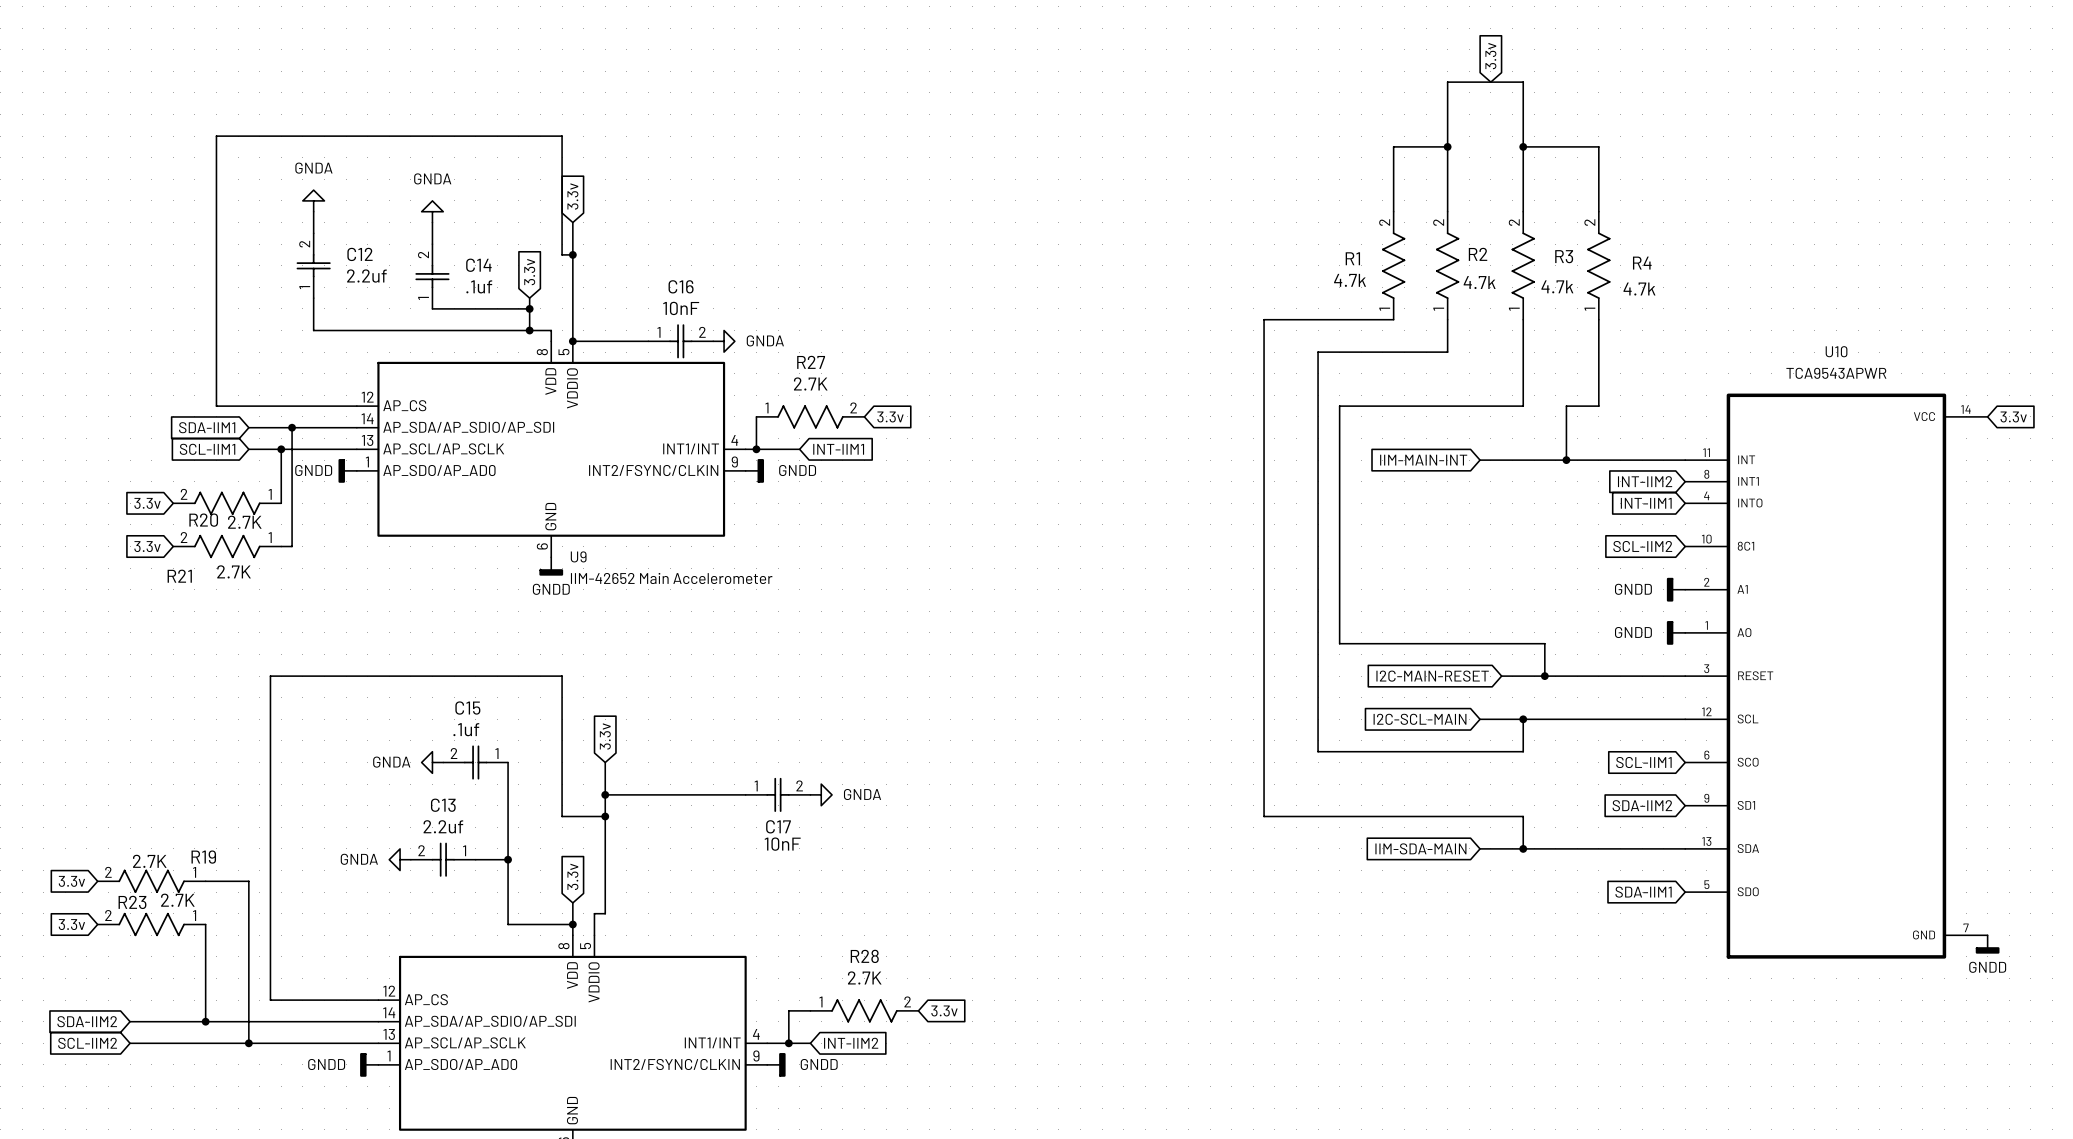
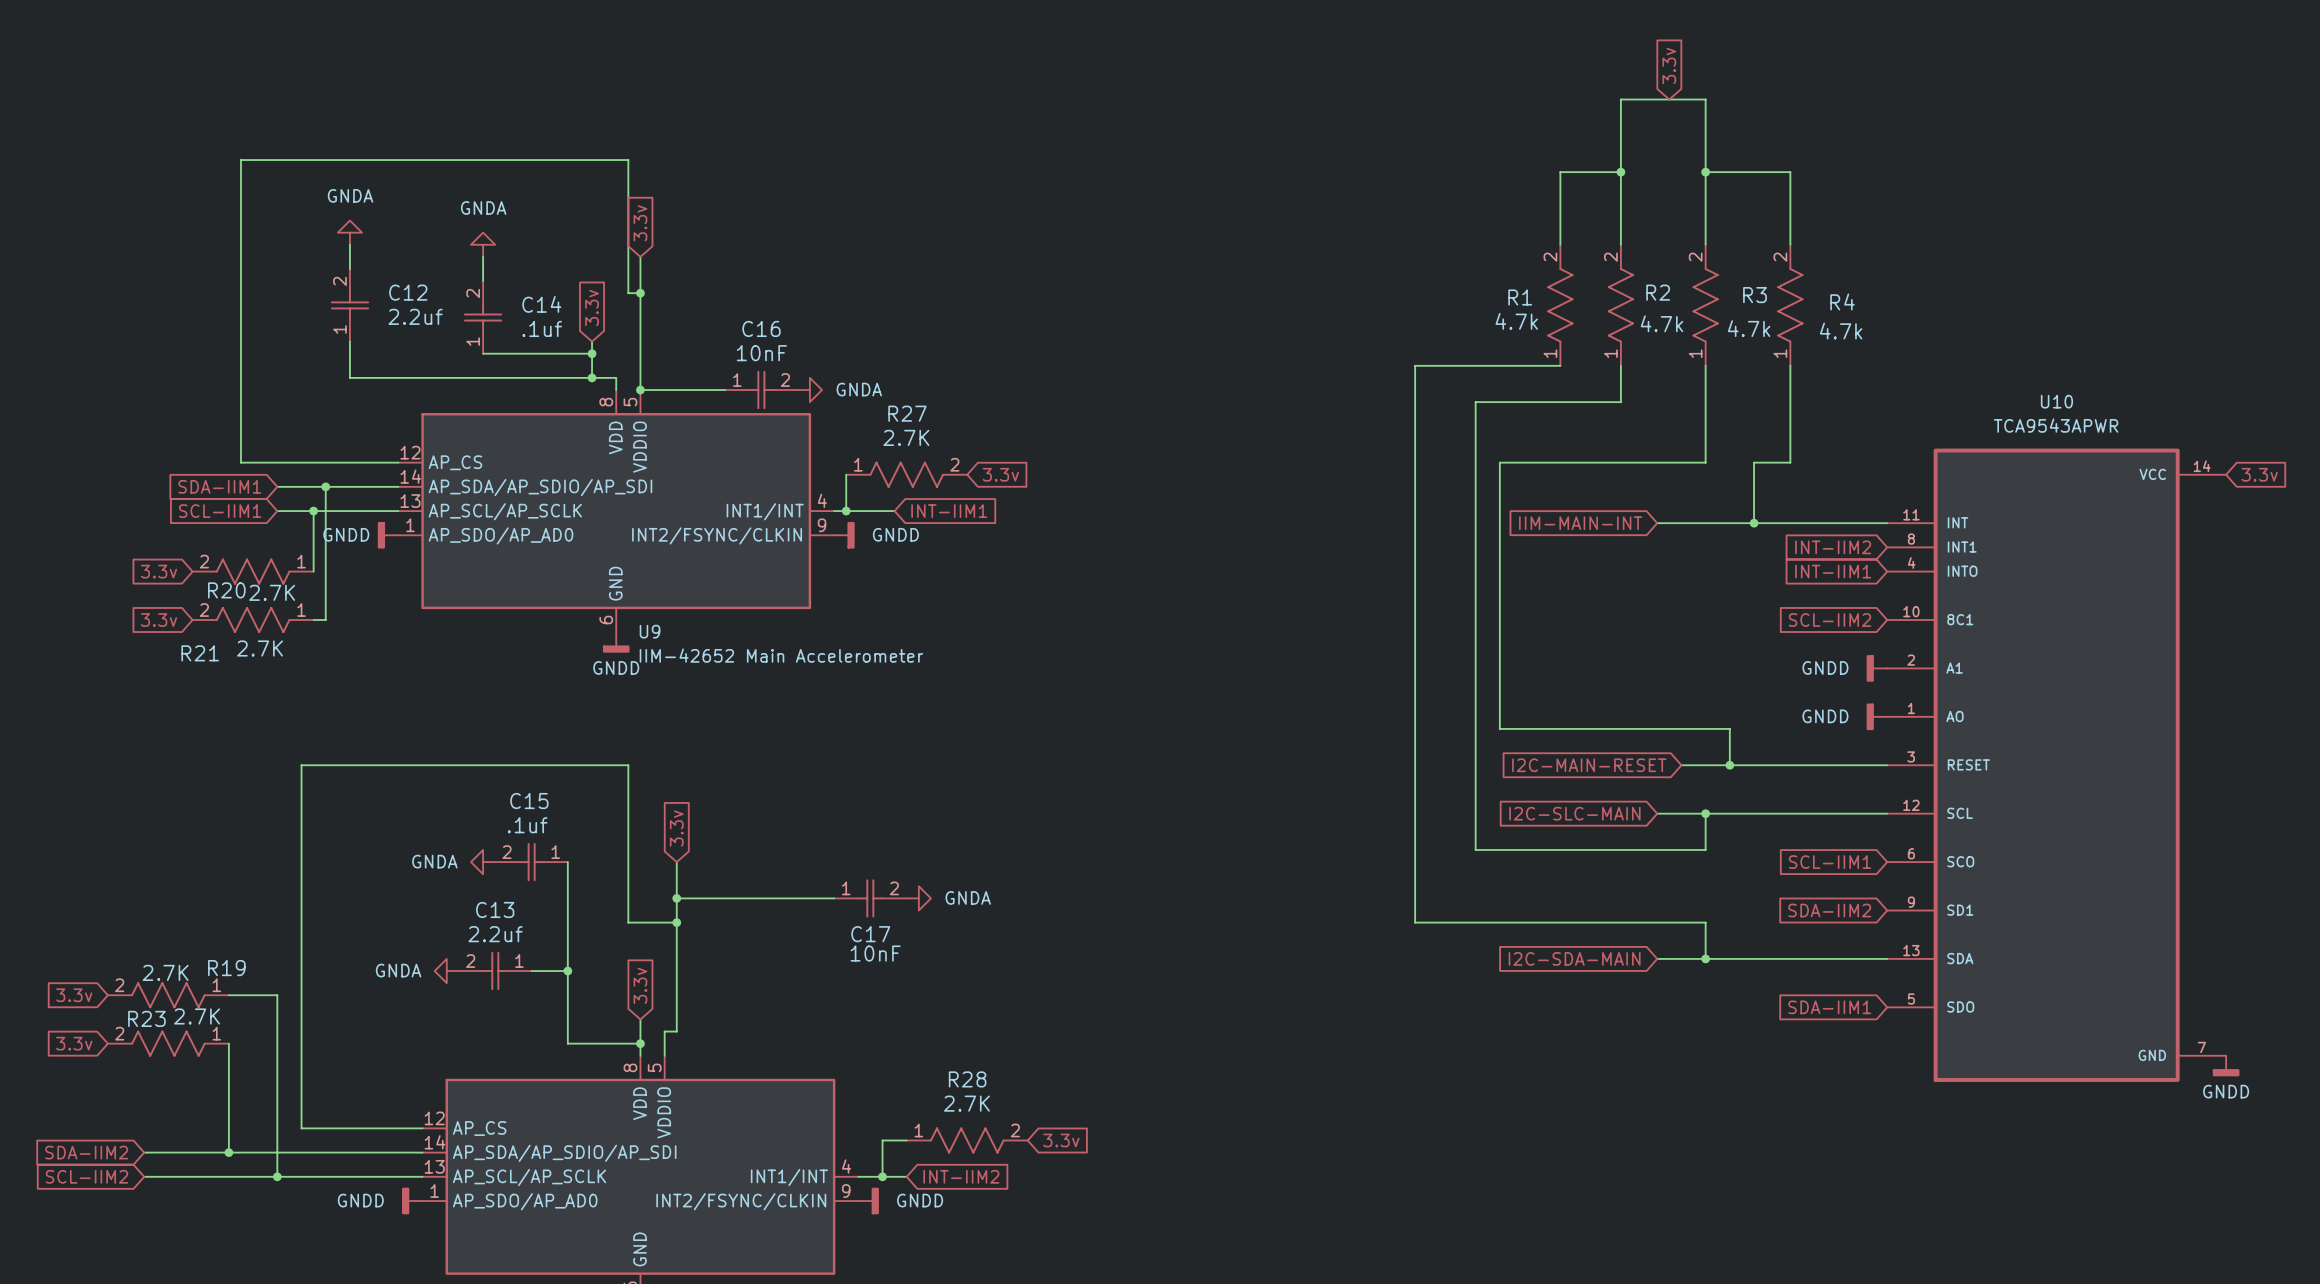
global label: I2C-SCL-MAIN (1420, 719) -> I2C-SLC-MAIN (1574, 813)
global label: IIM-SDA-MAIN (1420, 848) -> I2C-SDA-MAIN (1574, 958)

